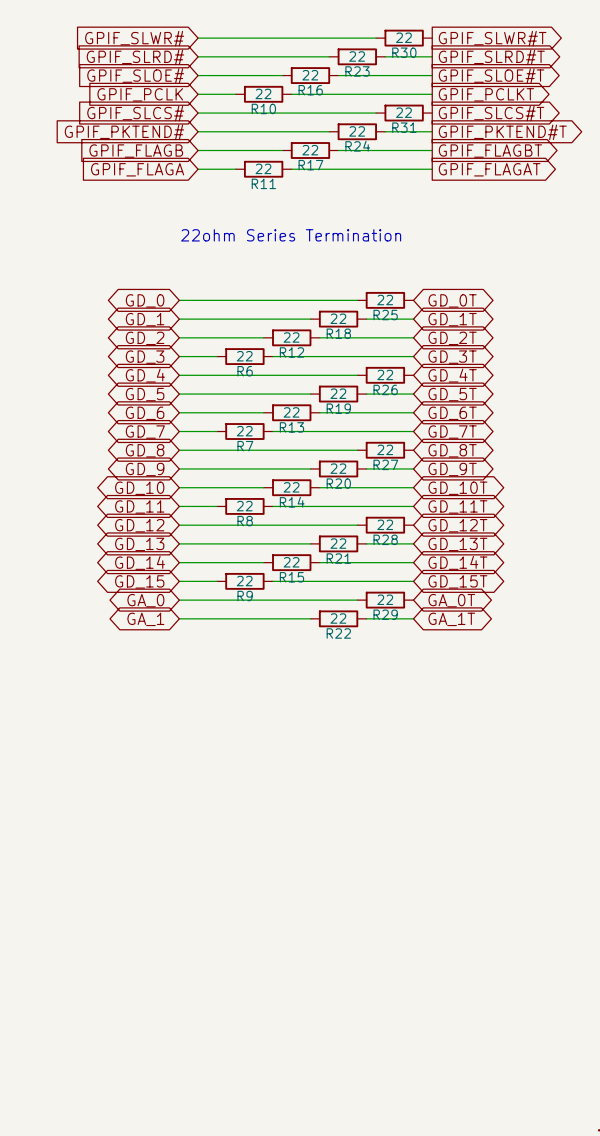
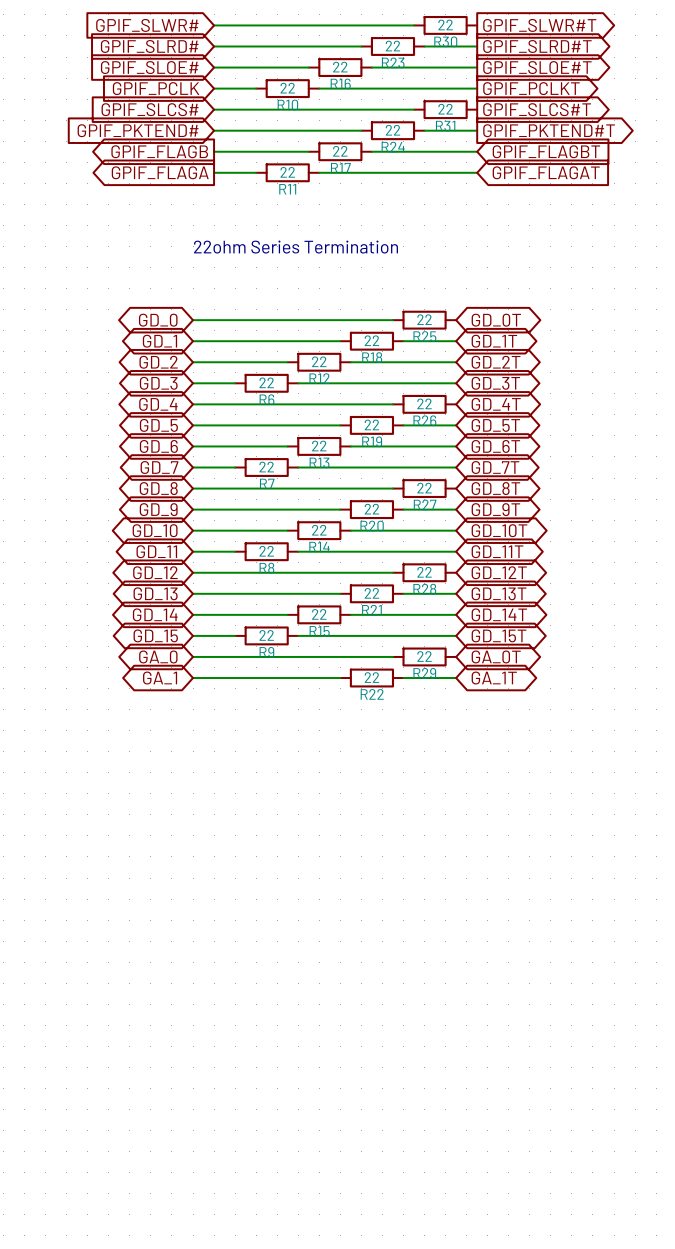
global label shape: input (136, 151) -> output (159, 151)
global label shape: output (490, 151) -> input (546, 151)
global label shape: input (137, 169) -> output (160, 172)
global label shape: output (489, 169) -> input (546, 172)

